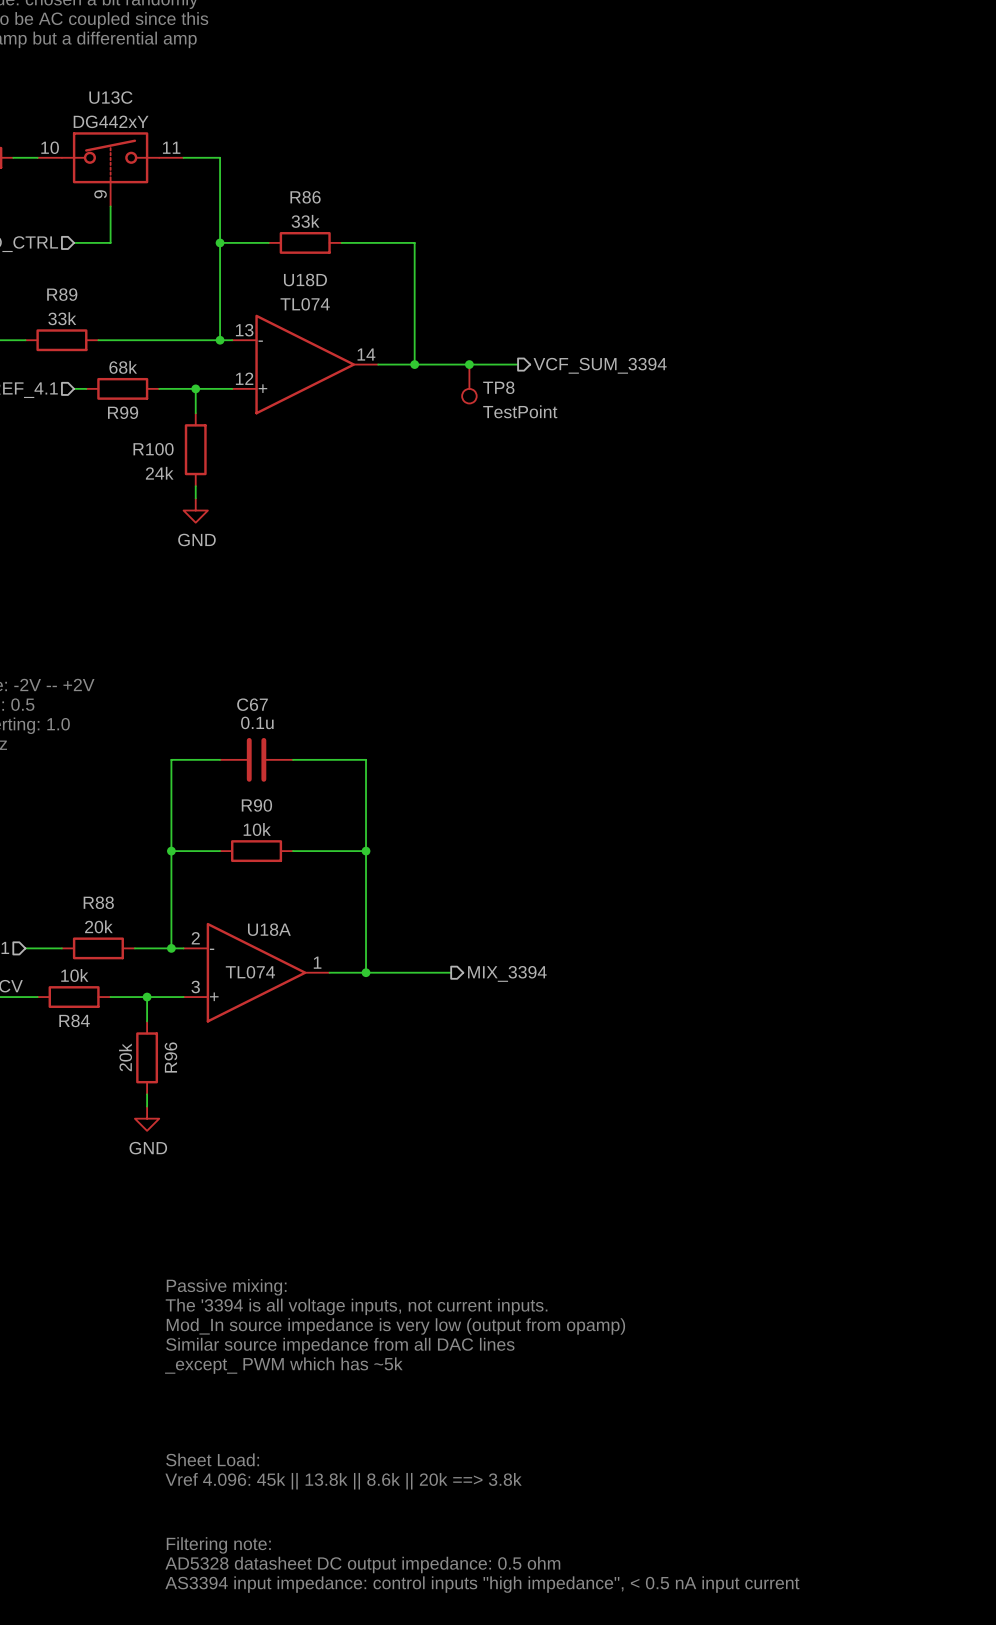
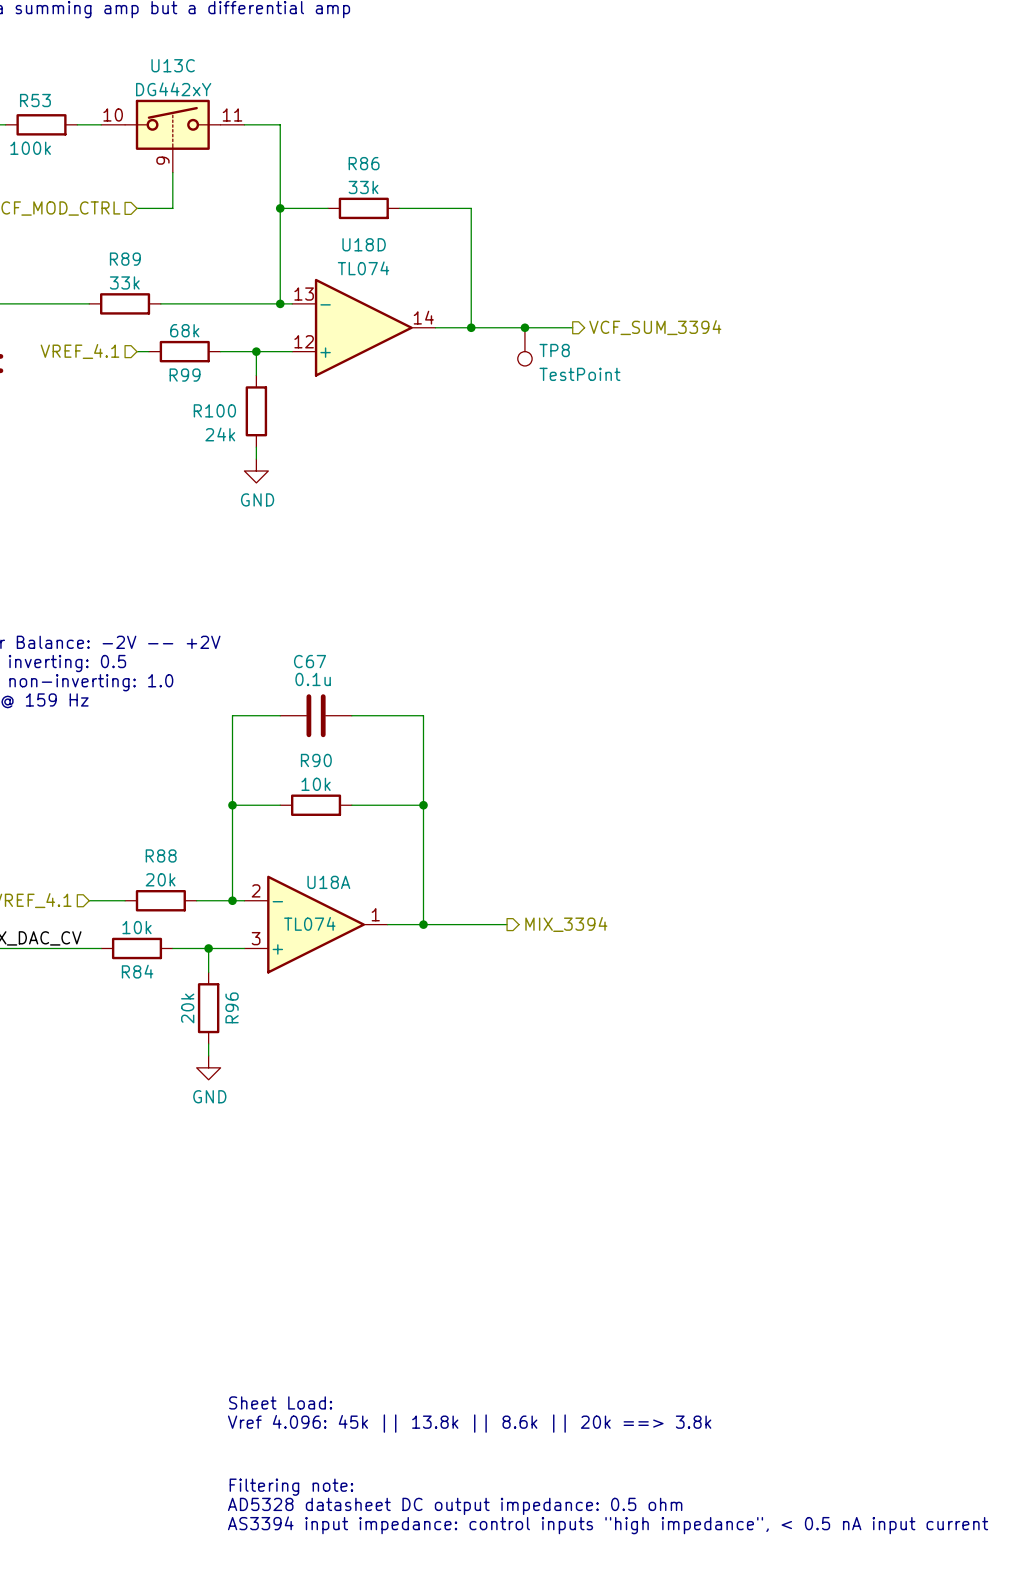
text: Passive mixing: (226, 1287) -> none
text: The '3394 is all voltage inputs, not current inputs. (356, 1306) -> none
text: Mod_In source impedance is very low (output from opamp) (395, 1326) -> none
text: Similar source impedance from all DAC lines (340, 1346) -> none
text: _except_ PWM which has ~5k (283, 1365) -> none

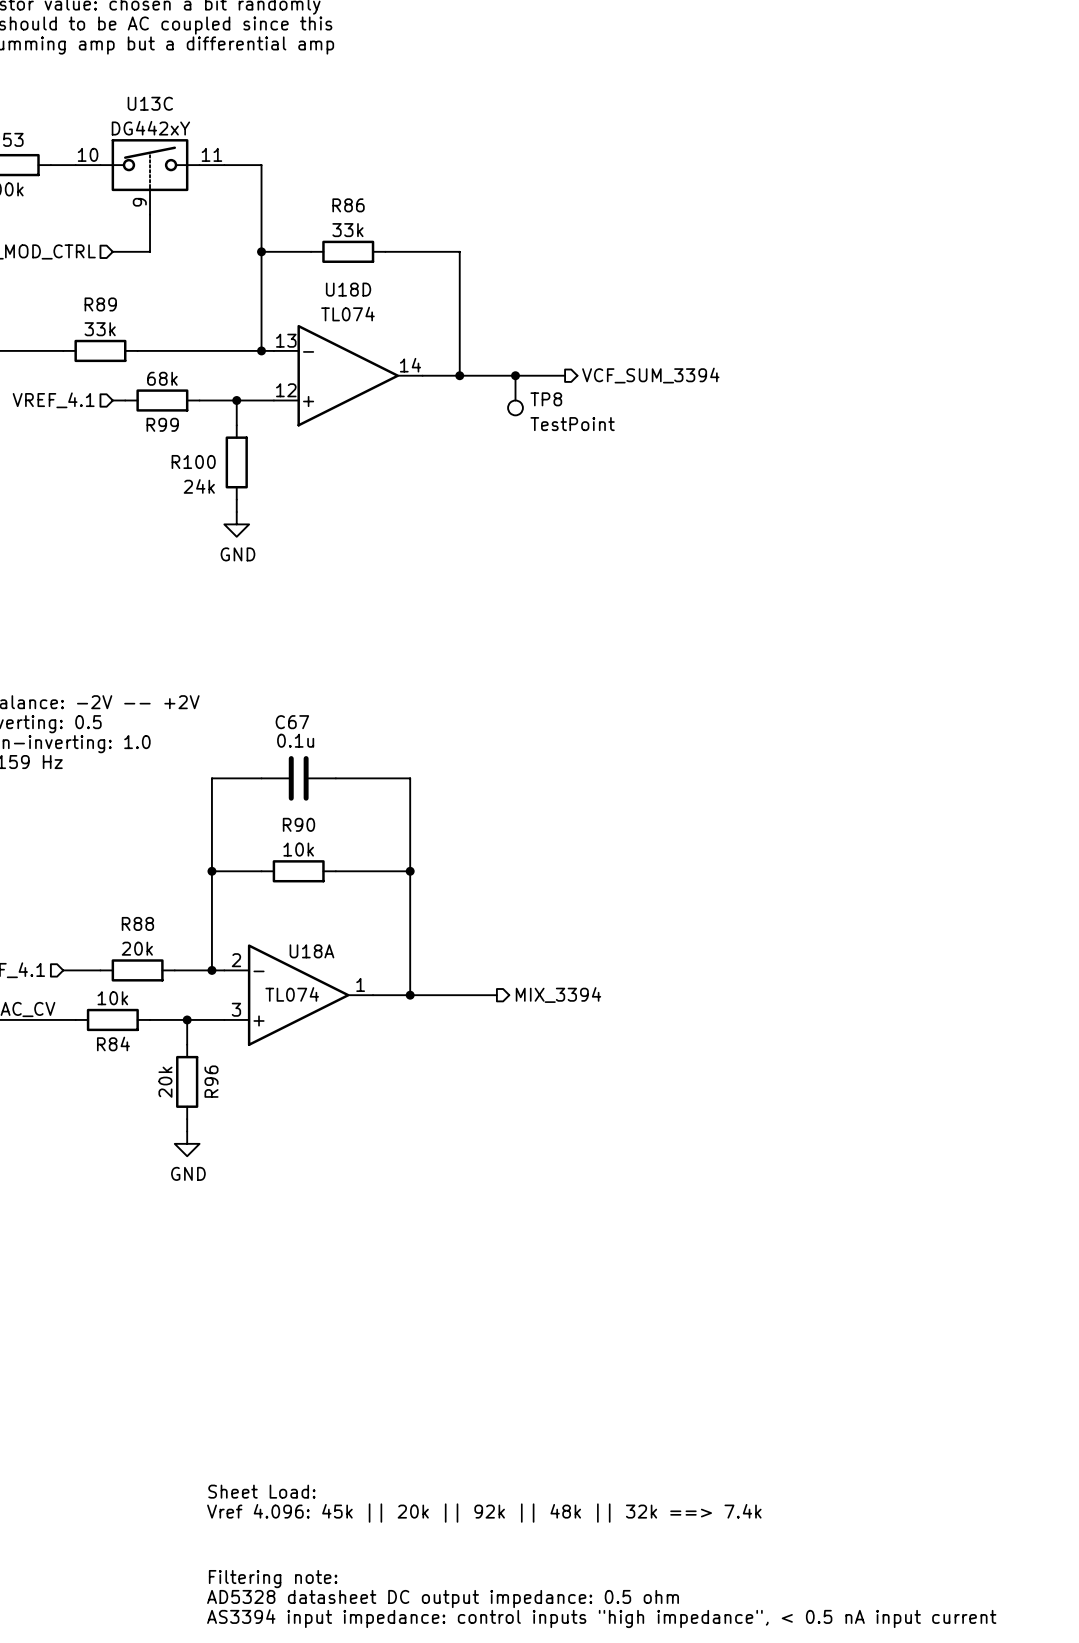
text: Vref 4.096: 45k || 13.8k || 8.6k || 20k ==> 3.8k (469, 1423) -> Vref 4.096: 45k || 20k || 92k || 48k || 32k ==> 7.4k (484, 1513)

